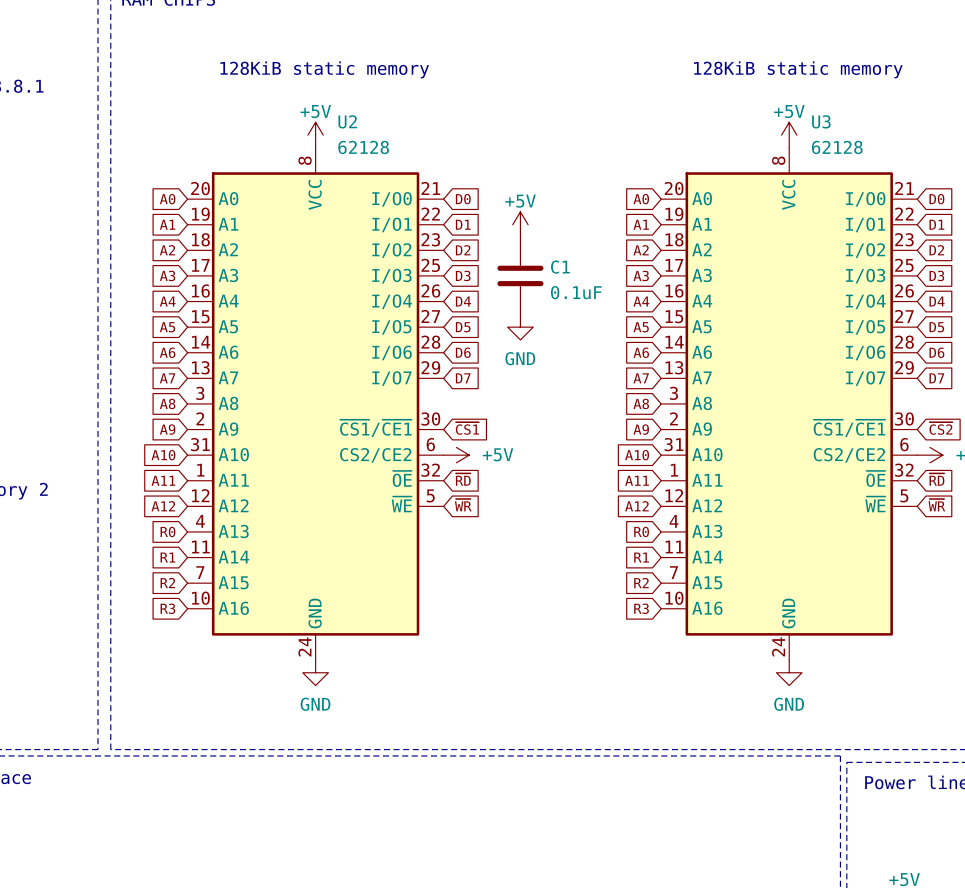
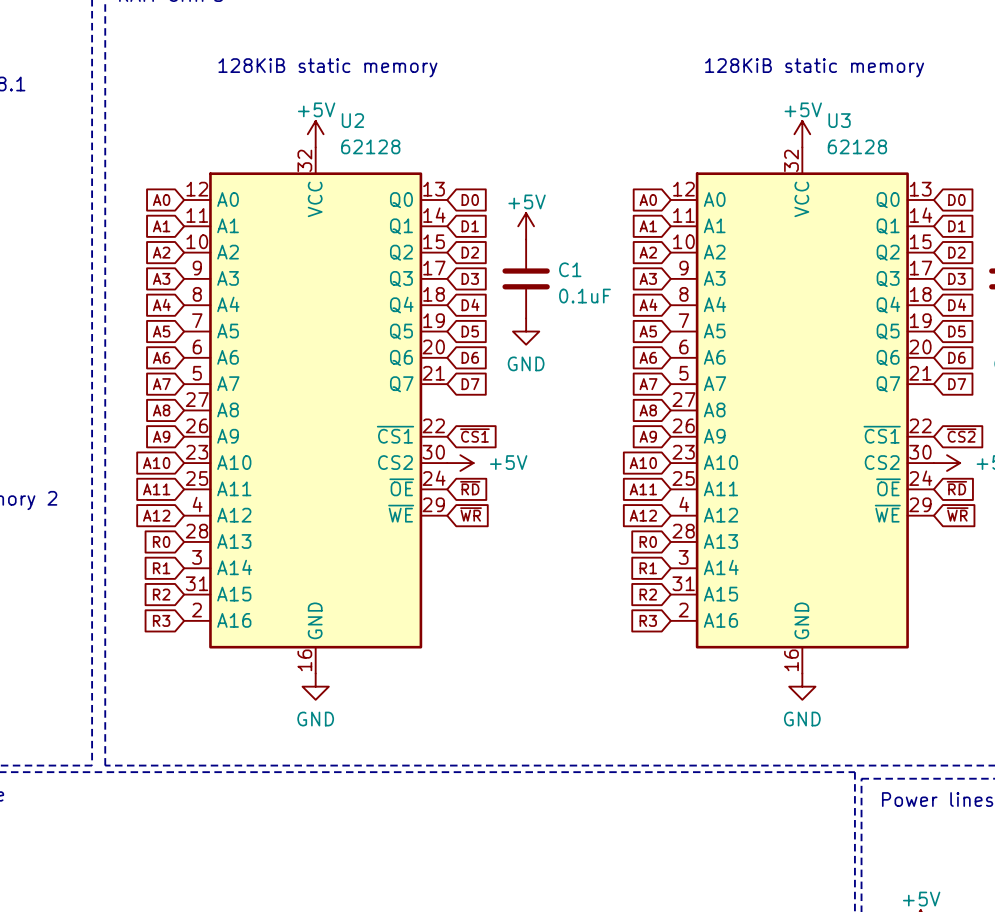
U2 symbol: [187, 147, 444, 660] -> [184, 147, 448, 674]
U3 symbol: [661, 147, 918, 660] -> [670, 147, 934, 674]

